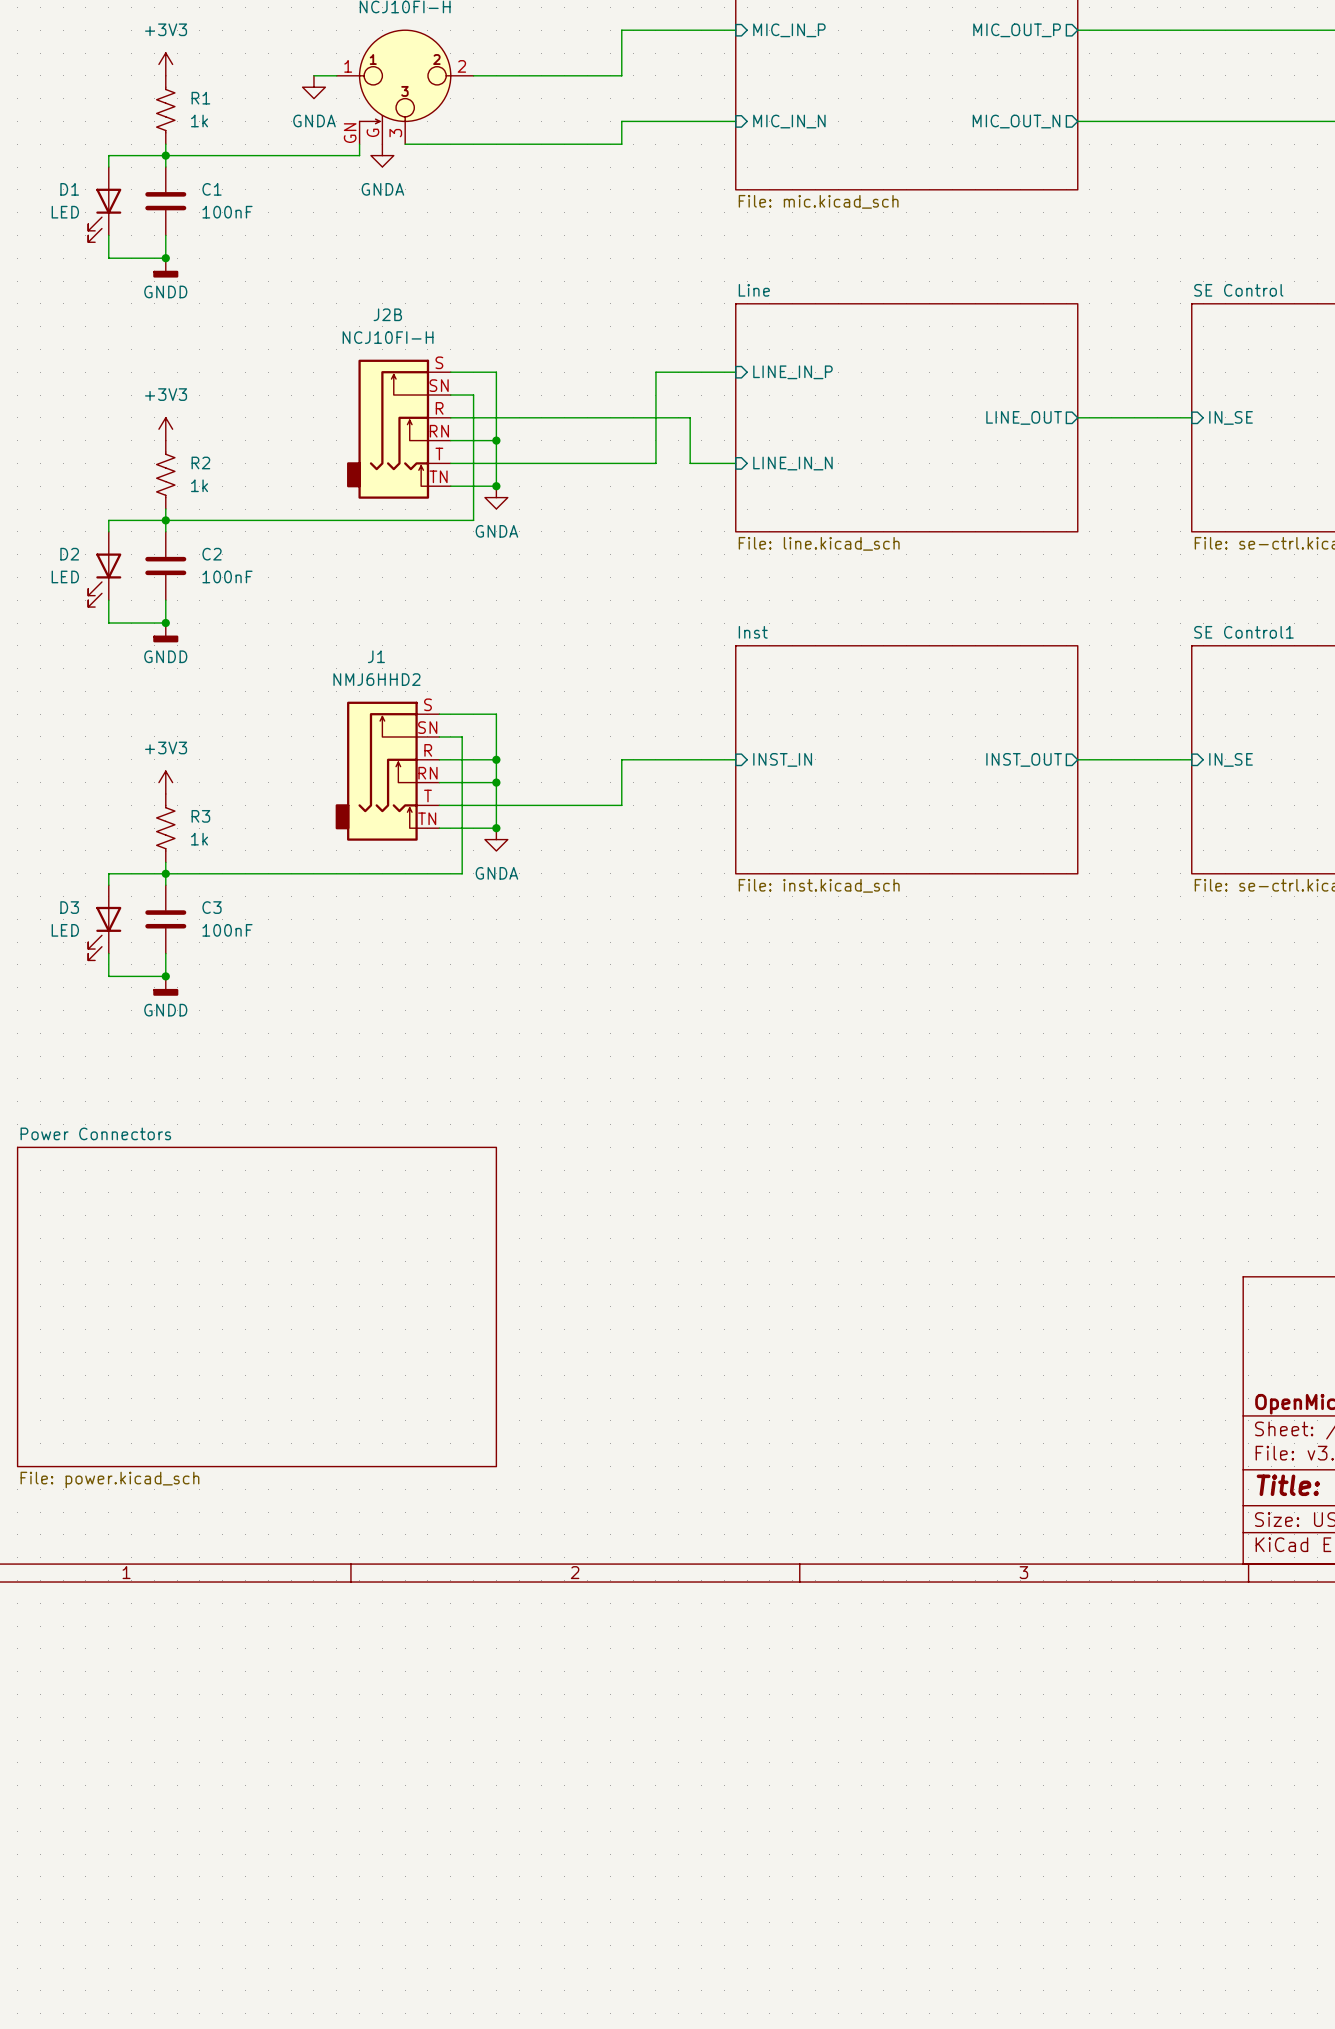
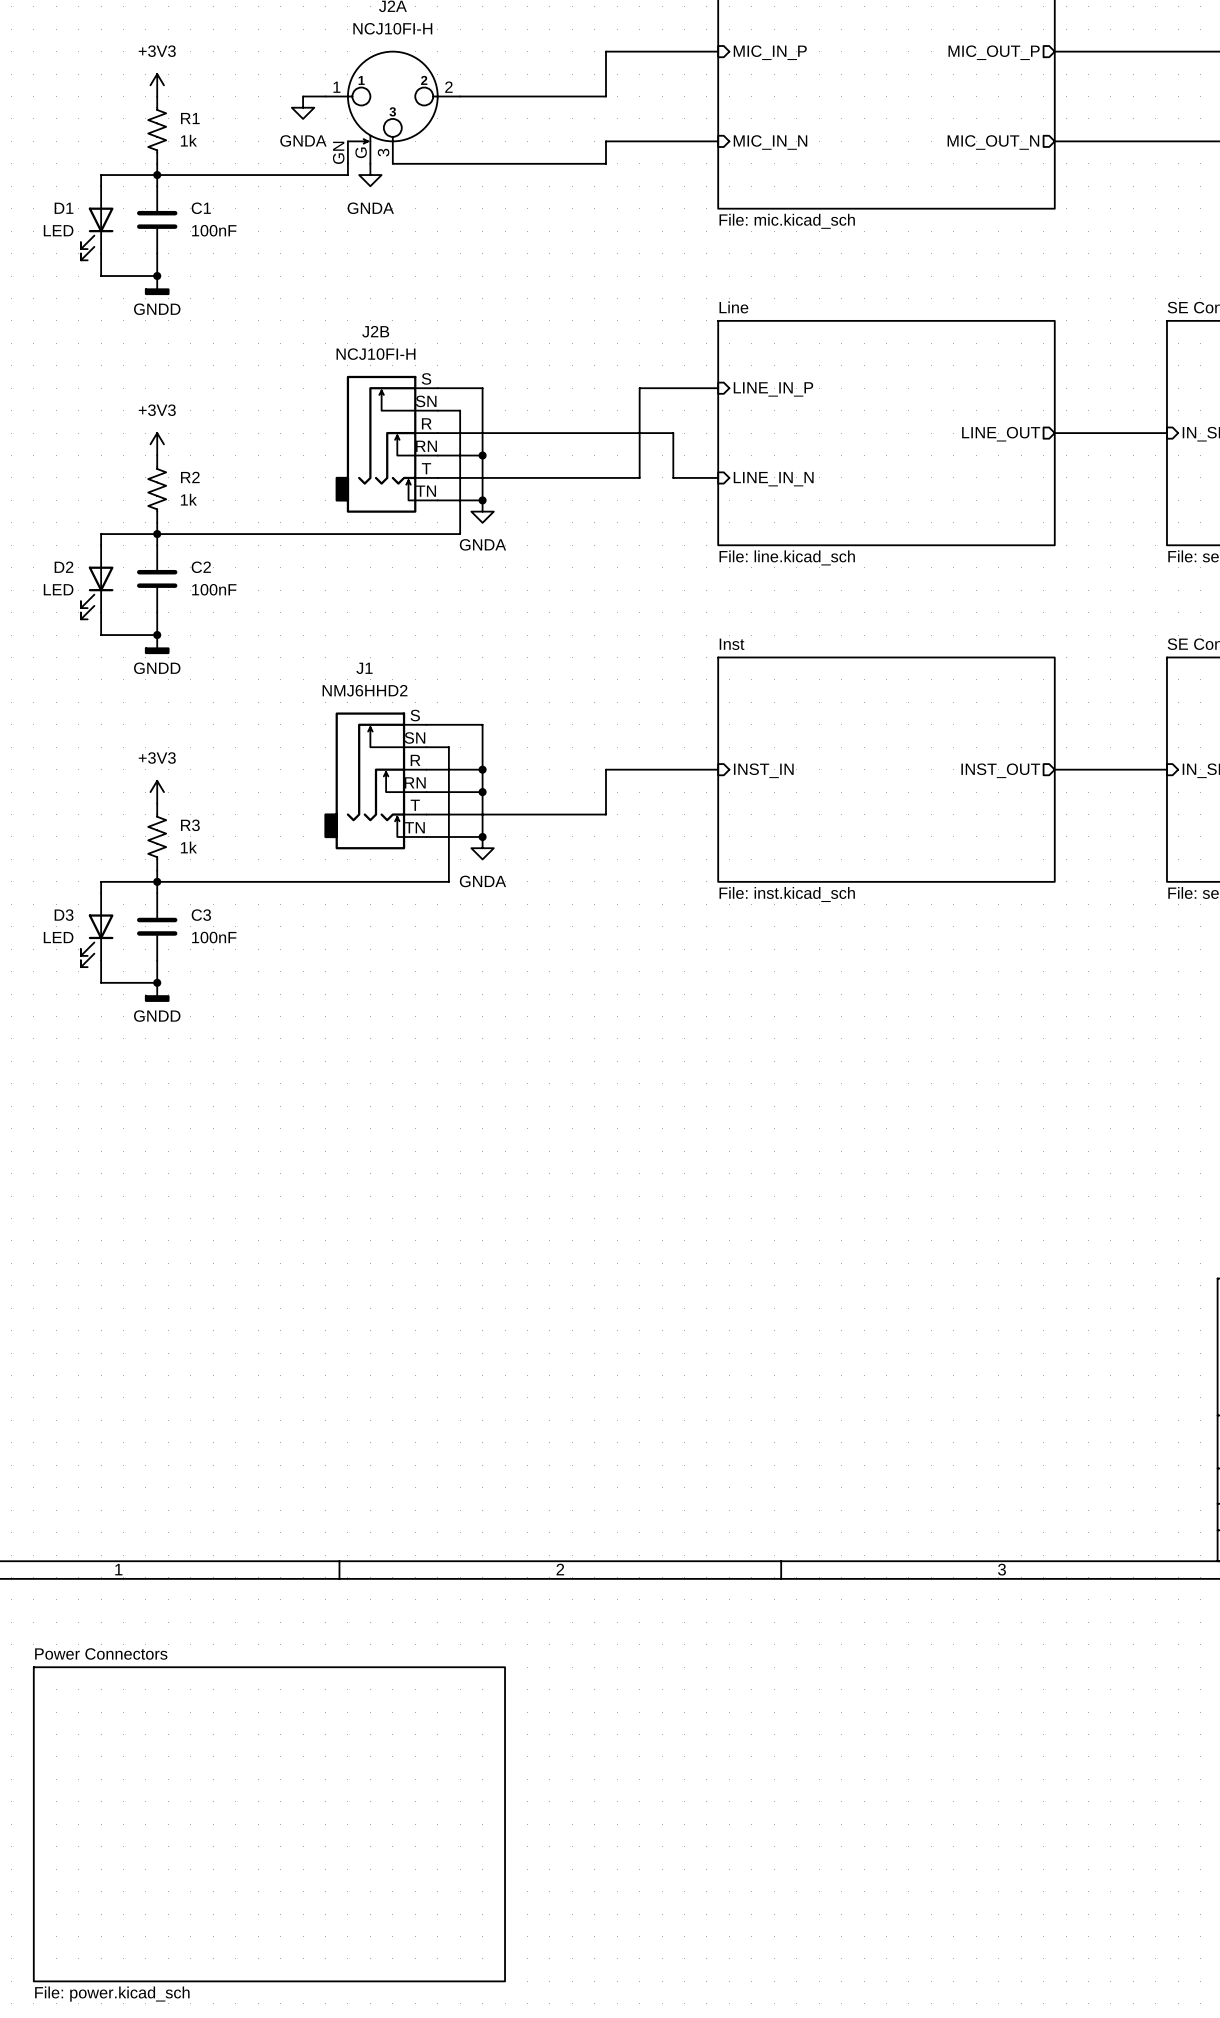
sheet Power Connectors: File: power.kicad_sch (256, 1306) -> none
sheet Power Connectors: none -> File: power.kicad_sch (269, 1824)

